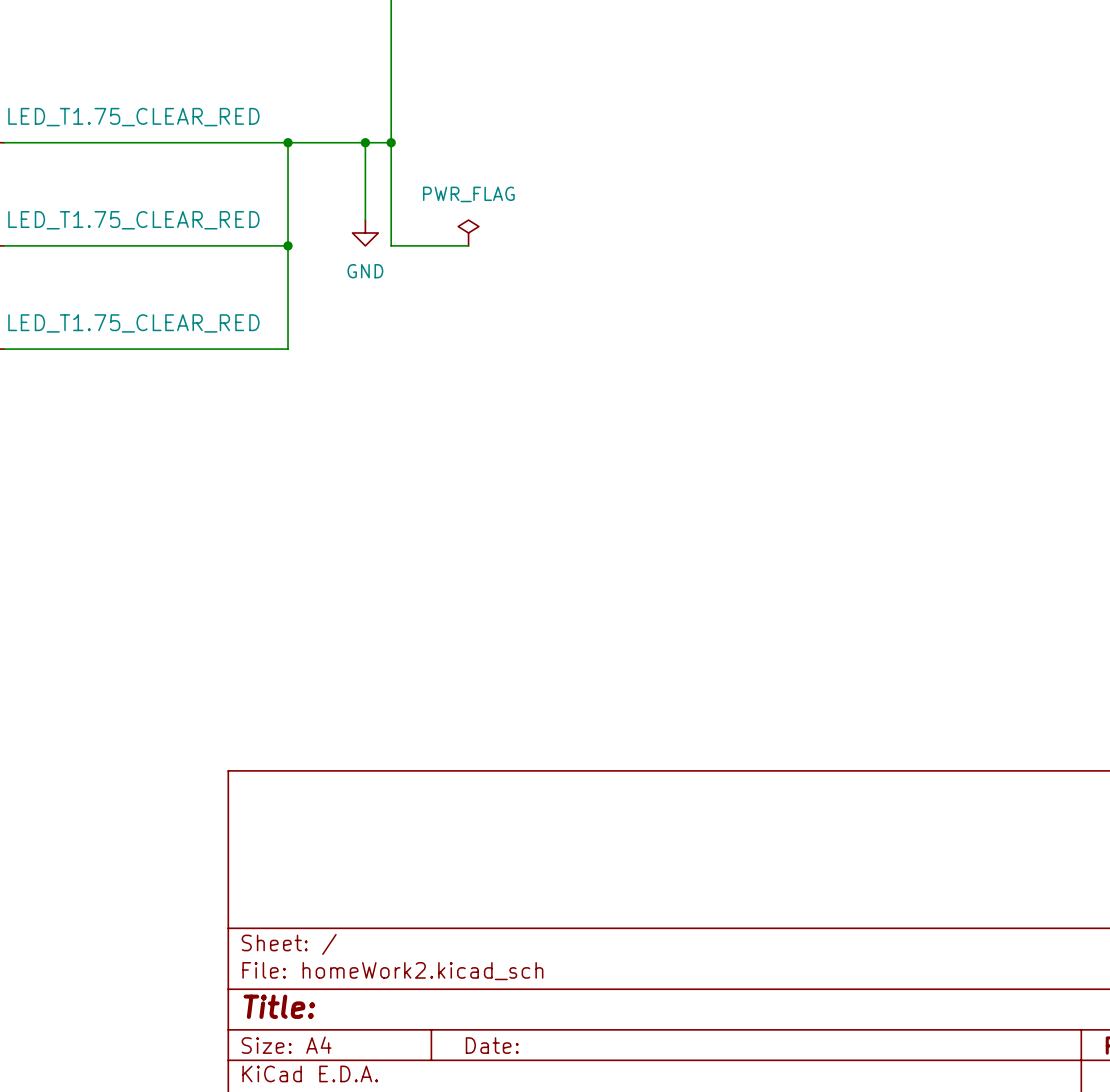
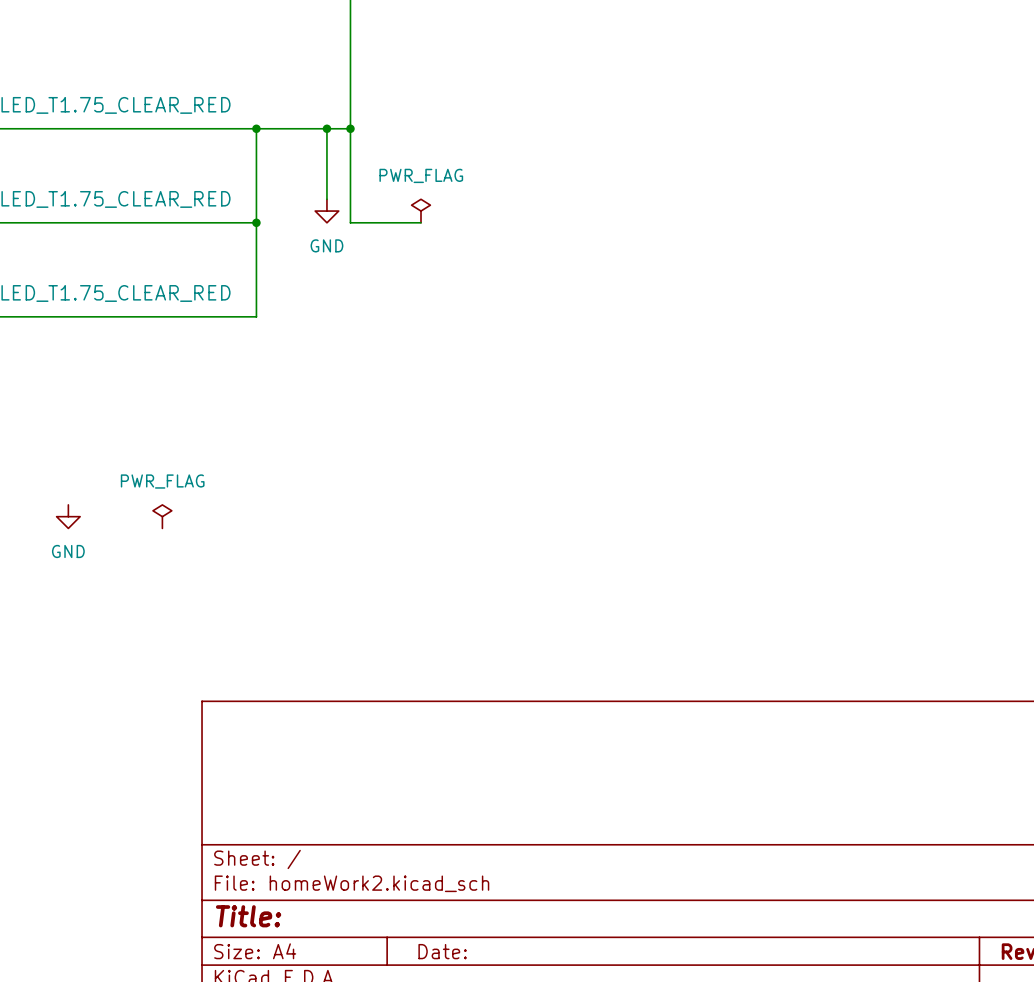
power symbol: none -> GND (68, 516)
power symbol: none -> PWR_FLAG (162, 516)

